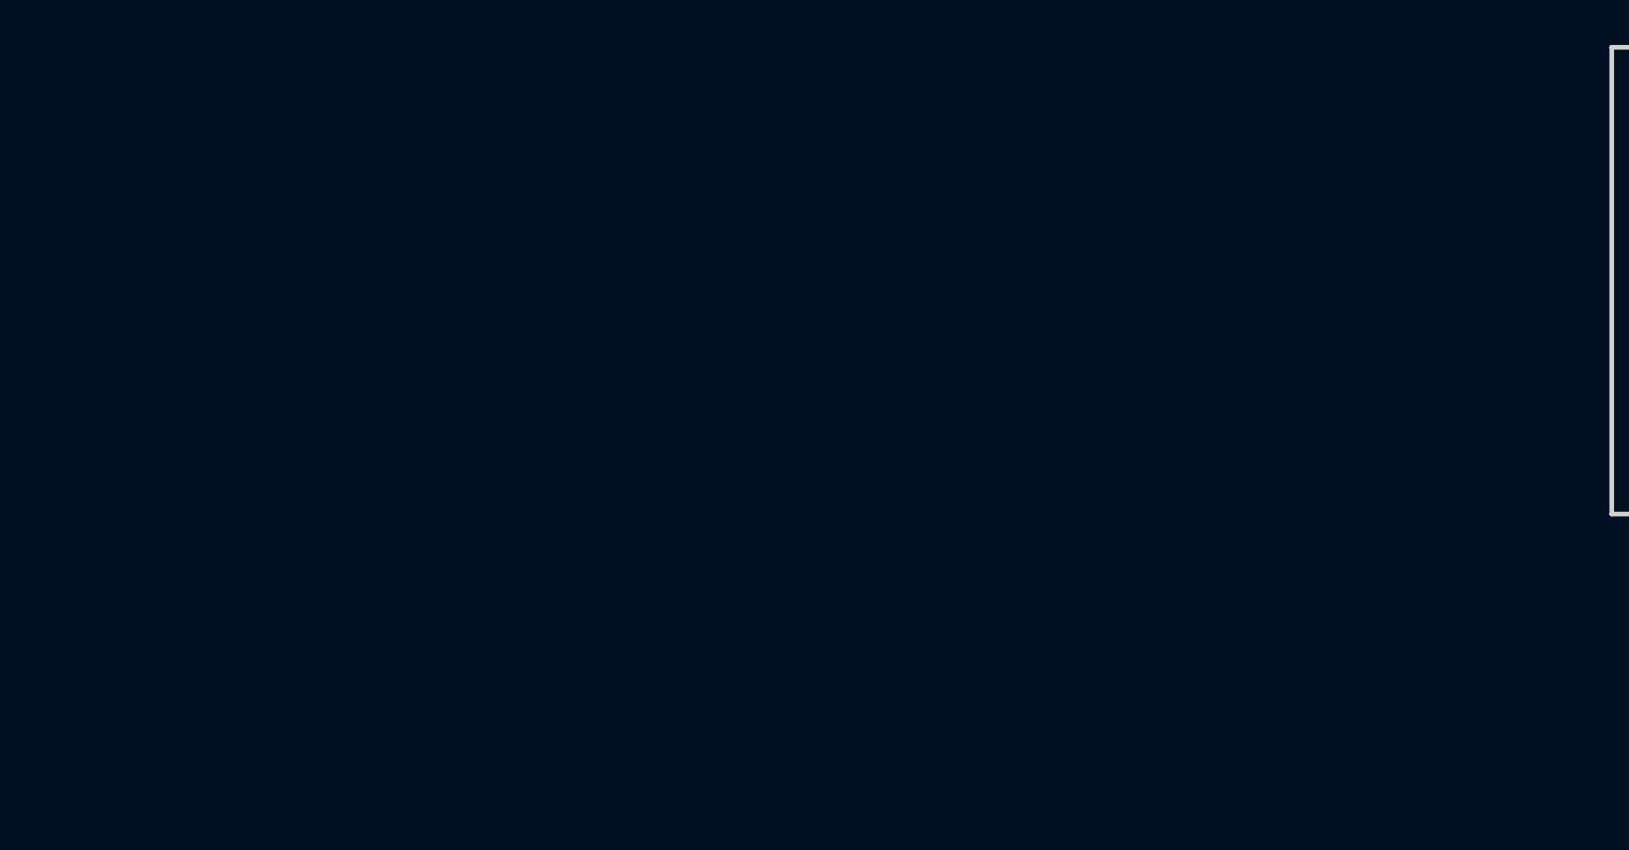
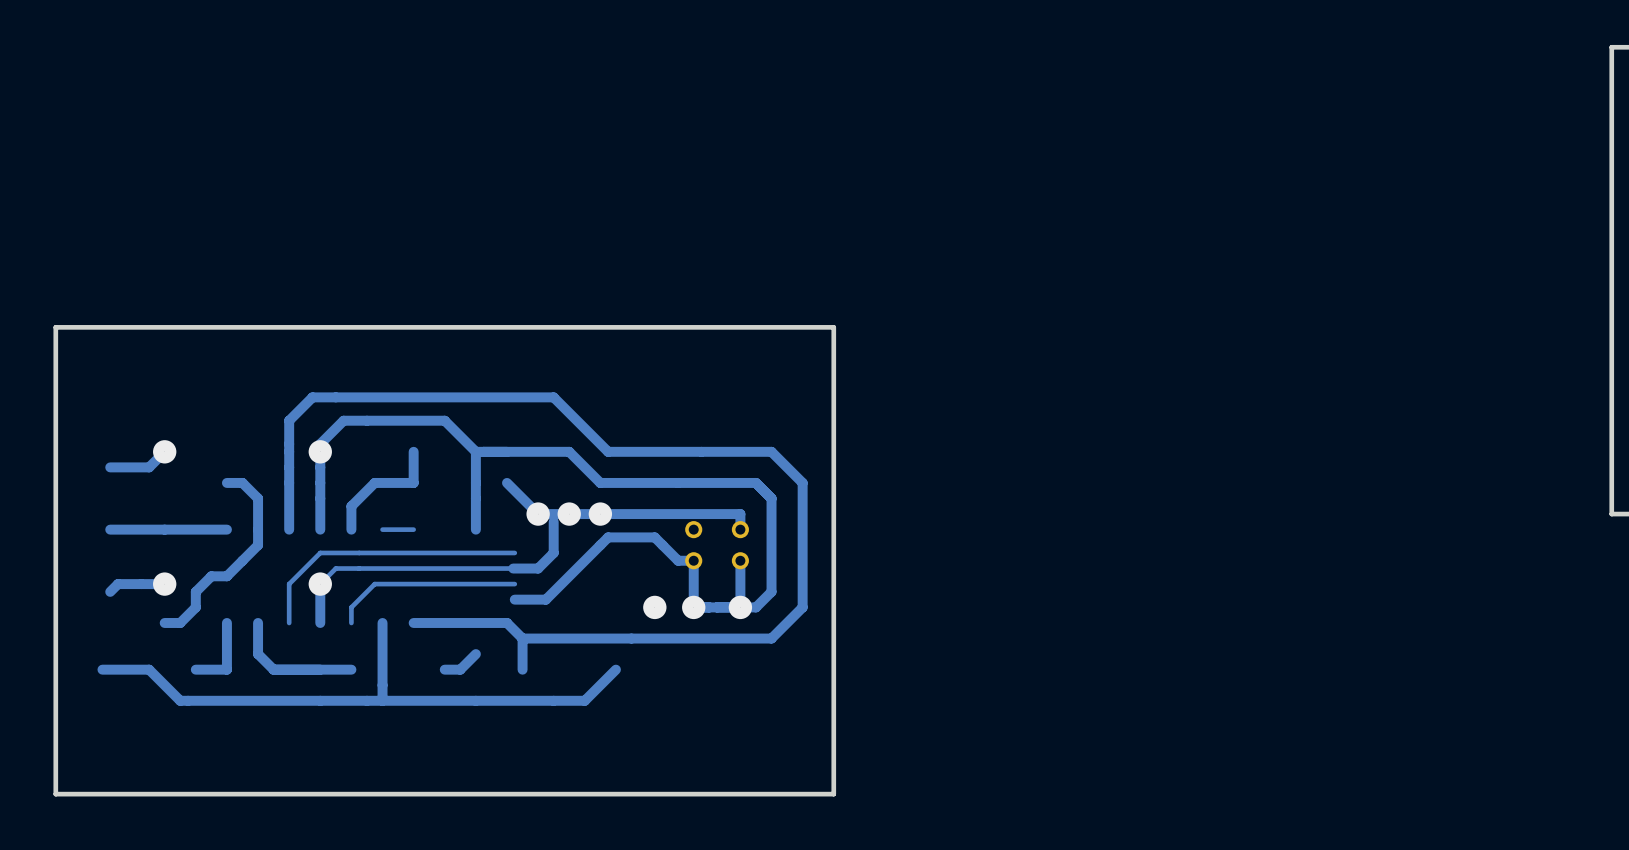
board edge: none -> (833, 327) (833, 794) (55, 794) (55, 327) (833, 327)
track: none -> (164, 451) (149, 467) (110, 467)
via: none -> (164, 451)
via: none -> (320, 451)
track: none -> (413, 451) (413, 482) (374, 482) (351, 506) (351, 529)
track: none -> (475, 451) (444, 420) (343, 420) (320, 444) (320, 529)
track: none -> (475, 451) (569, 451) (600, 482) (755, 482) (771, 498) (771, 591) (755, 607) (693, 607) (693, 560) (678, 560) (654, 537) (608, 537) (545, 599) (514, 599)
track: none -> (475, 451) (475, 529)
track: none -> (226, 482) (242, 482) (258, 498) (258, 545) (226, 576) (211, 576) (195, 591) (195, 607) (180, 622) (164, 622)
track: none -> (507, 482) (538, 514) (740, 514) (740, 529)
via: none -> (538, 514)
via: none -> (569, 514)
via: none -> (600, 514)
track: none -> (553, 521) (553, 552) (538, 568) (513, 568)
track: none -> (226, 529) (110, 529)
track: none -> (289, 529) (289, 420) (312, 397) (553, 397) (608, 451) (771, 451) (802, 482) (802, 607) (771, 638) (522, 638)
track: none -> (413, 529) (382, 529)
part: none -> (693, 545)
part: none -> (740, 545)
track: none -> (514, 552) (320, 552) (289, 584) (289, 622)
track: none -> (740, 560) (740, 607)
track: none -> (514, 568) (335, 568) (320, 584) (320, 622)
track: none -> (164, 584) (118, 584) (110, 591)
via: none -> (164, 584)
via: none -> (320, 584)
track: none -> (514, 584) (374, 584) (351, 607) (351, 622)
via: none -> (654, 607)
via: none -> (693, 607)
via: none -> (740, 607)
track: none -> (226, 622) (226, 669) (195, 669)
track: none -> (258, 622) (258, 654) (273, 669) (351, 669)
track: none -> (382, 622) (382, 700)
track: none -> (413, 622) (507, 622) (522, 638)
track: none -> (522, 638) (522, 669)
track: none -> (475, 654) (460, 669) (444, 669)
track: none -> (615, 669) (584, 700) (180, 700) (149, 669) (102, 669)

